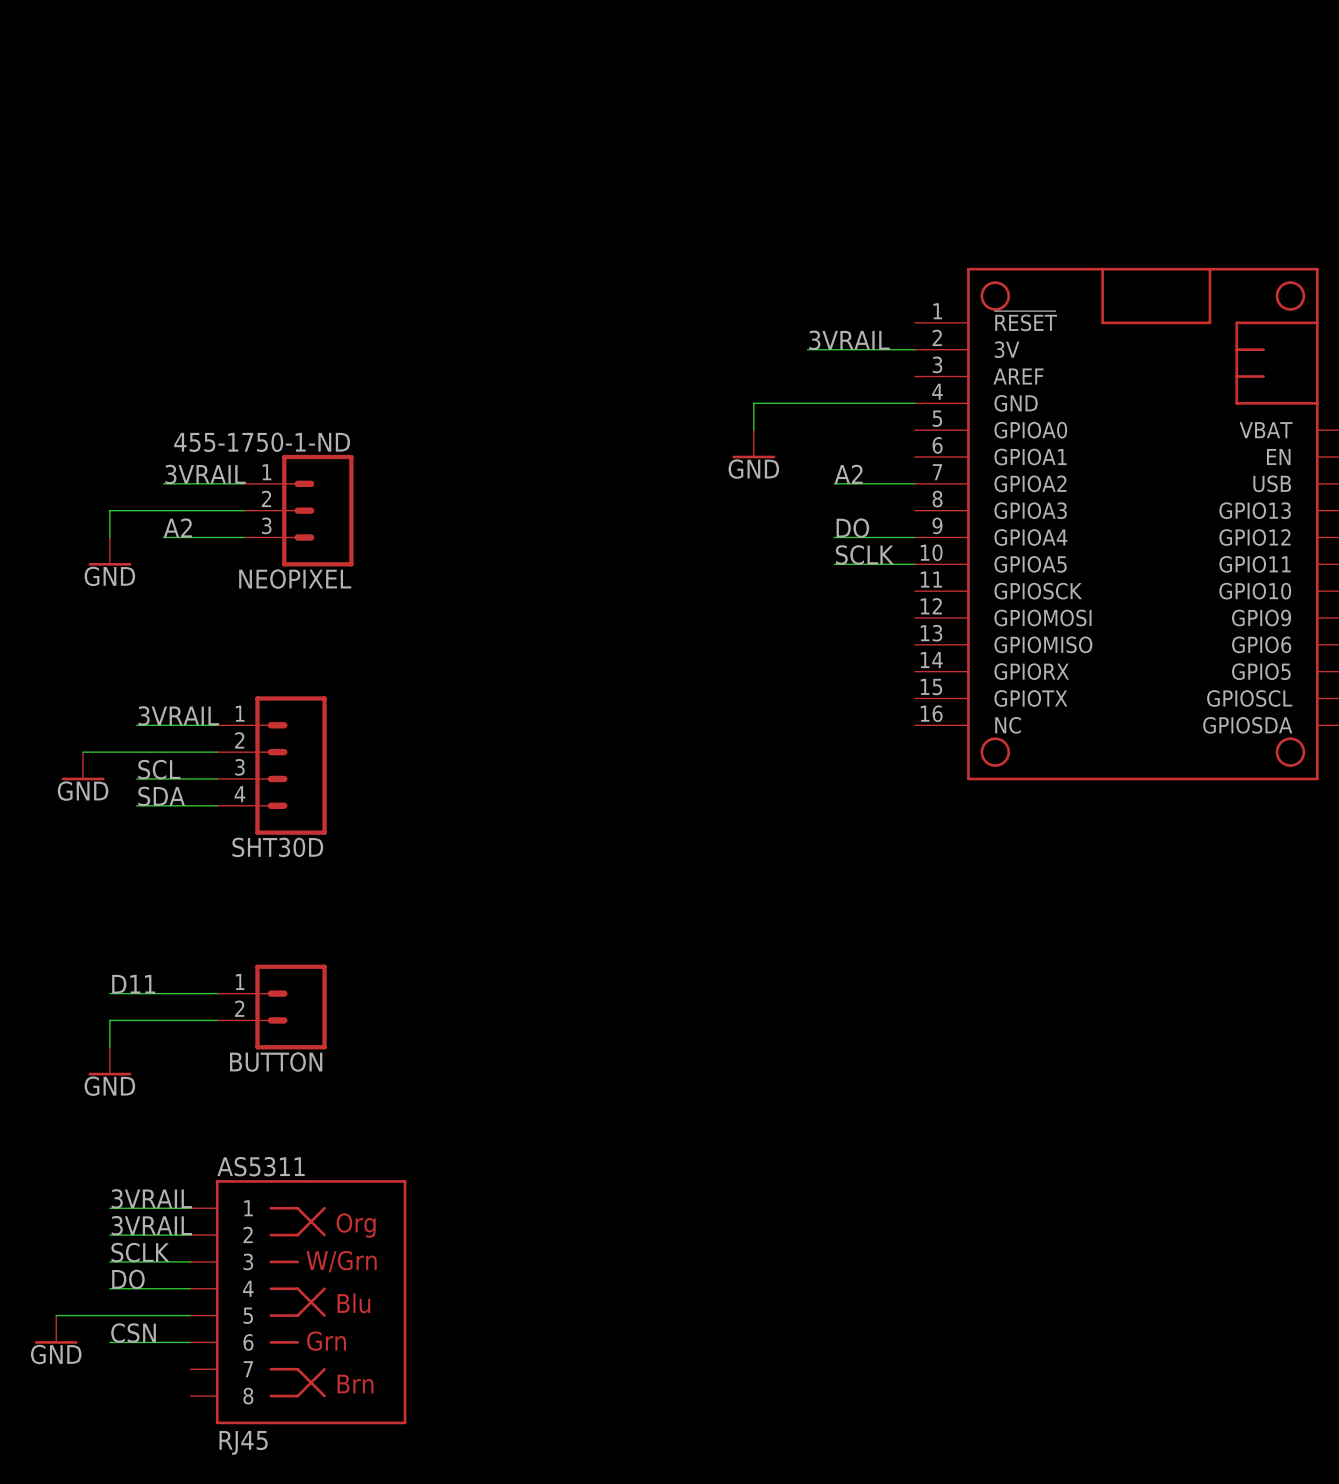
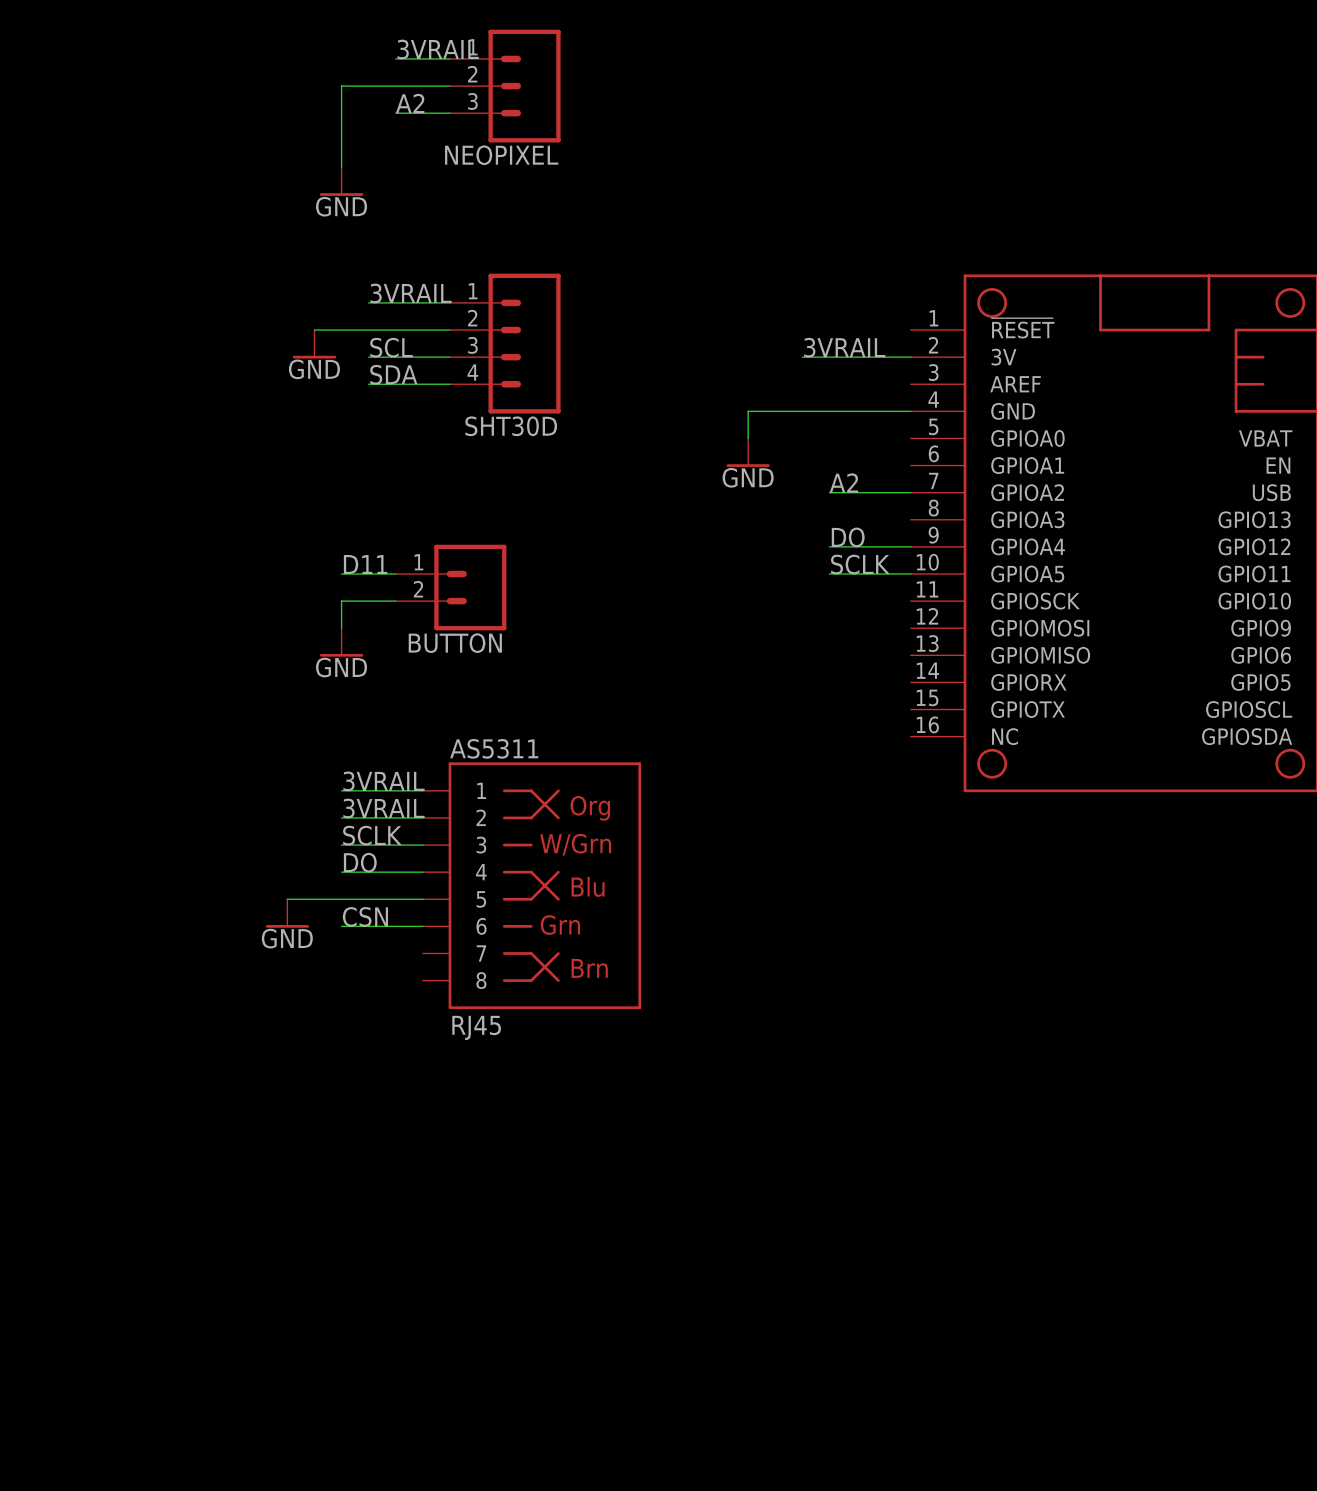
label: none -> 3VRAIL (438, 49)
wire: none -> (395, 58) (450, 58)
wire: none -> (450, 86) (341, 86) (341, 167)
NEOPIXEL: none -> (505, 86)
label: none -> A2 (410, 103)
wire: none -> (395, 113) (450, 113)
power symbol: none -> GND (341, 181)
label: none -> 3VRAIL (411, 293)
wire: none -> (368, 302) (450, 302)
wire: none -> (314, 330) (450, 330)
power symbol: none -> GND (314, 344)
label: none -> SCL (391, 347)
wire: none -> (368, 357) (450, 357)
label: none -> SDA (393, 374)
label: 3VRAIL (205, 474) -> none
wire: (163, 483) (244, 483) -> (368, 384) (450, 384)
wire: (244, 510) (109, 510) (109, 537) -> none
NEOPIXEL: 455-1750-1-ND (298, 510) -> none
label: A2 (177, 527) -> none
wire: (163, 537) (244, 537) -> none
power symbol: GND (109, 551) -> none
label: none -> D11 (365, 564)
wire: none -> (341, 573) (395, 573)
BUTTON: none -> (451, 587)
wire: none -> (395, 601) (341, 601) (341, 628)
power symbol: none -> GND (341, 642)
label: 3VRAIL (178, 715) -> none
wire: (136, 725) (217, 725) -> (341, 790) (422, 790)
wire: (83, 752) (217, 752) -> (287, 899) (422, 899)
SHT30D position: (271, 765) -> (505, 343)
power symbol: GND (83, 766) -> none
label: SCL (159, 769) -> none
label: none -> 3VRAIL (383, 781)
wire: (136, 778) (217, 778) -> (341, 845) (422, 845)
label: SDA (161, 796) -> none
label: none -> 3VRAIL (383, 808)
wire: (136, 805) (217, 805) -> (341, 872) (422, 872)
wire: none -> (341, 817) (422, 817)
label: none -> SCLK (372, 835)
label: none -> DO (360, 862)
power symbol: none -> GND (287, 913)
label: none -> CSN (365, 916)
wire: none -> (341, 926) (422, 926)
label: D11 (133, 984) -> none
wire: (109, 993) (217, 993) -> none
BUTTON: (271, 1007) -> none
wire: (217, 1020) (109, 1020) (109, 1047) -> none
power symbol: GND (109, 1061) -> none
label: 3VRAIL (151, 1198) -> none
wire: (109, 1208) (190, 1208) -> none
label: 3VRAIL (151, 1225) -> none
wire: (109, 1235) (190, 1235) -> none
label: SCLK (140, 1252) -> none
wire: (109, 1261) (190, 1261) -> none
label: DO (128, 1279) -> none
wire: (109, 1288) (190, 1288) -> none
AS5311 position: (298, 1302) -> (531, 885)
wire: (56, 1315) (190, 1315) -> none
power symbol: GND (56, 1329) -> none
label: CSN (133, 1333) -> none
wire: (109, 1342) (190, 1342) -> none

